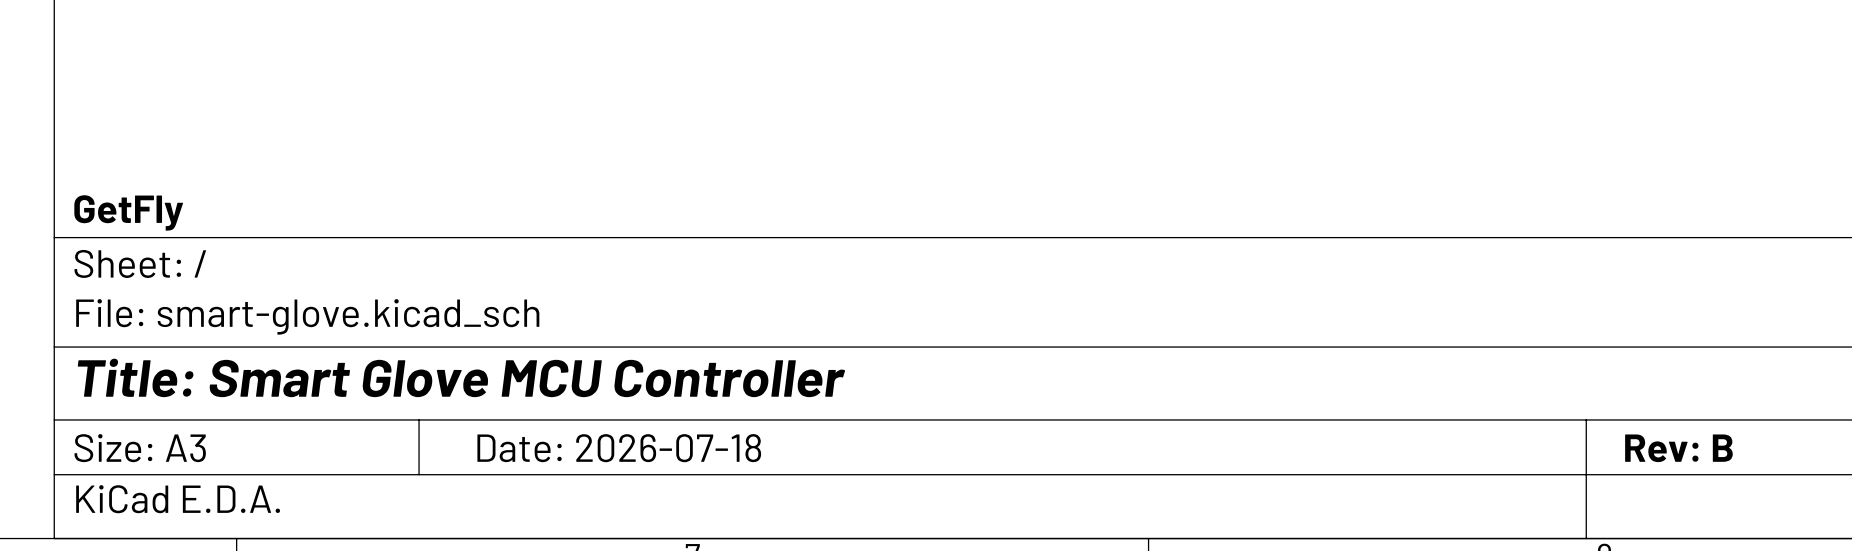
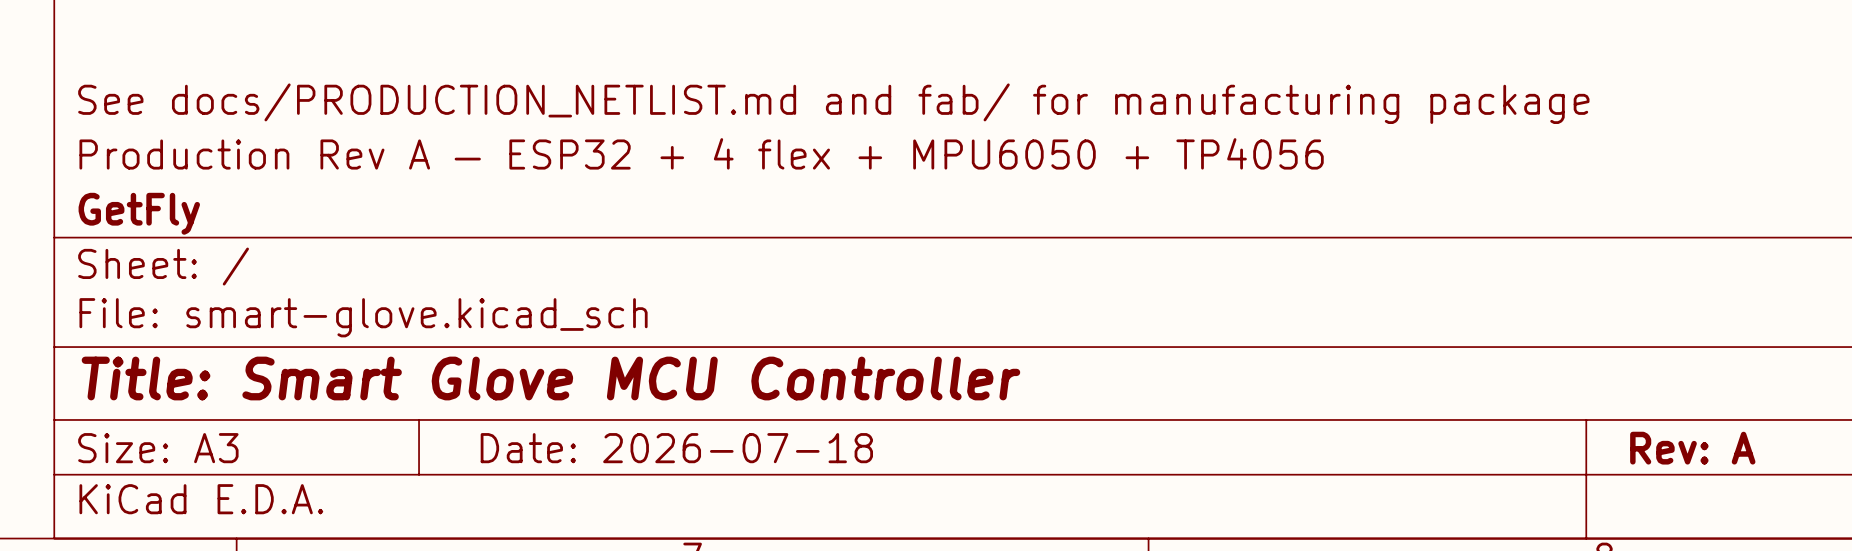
title block: none -> See docs/PRODUCTION_NETLIST.md and fab/ for manufacturing package (833, 103)
title block: none -> Production Rev A — ESP32 + 4 flex + MPU6050 + TP4056 (701, 153)
title block: Rev: B (1678, 448) -> Rev: A (1692, 448)

